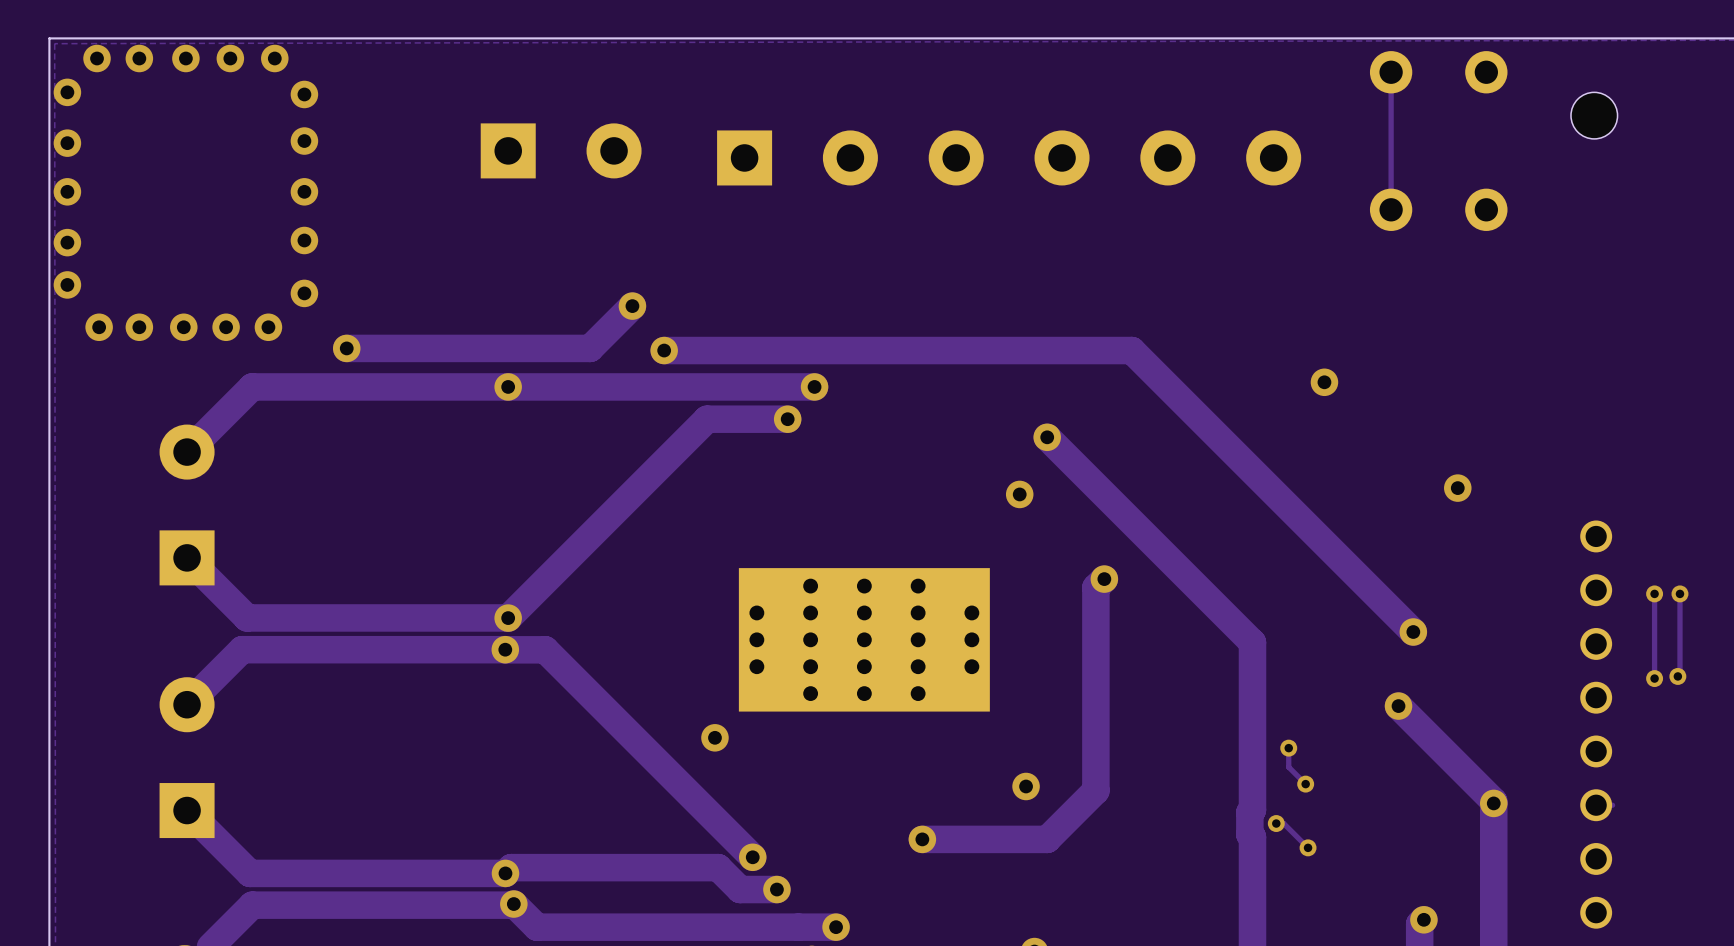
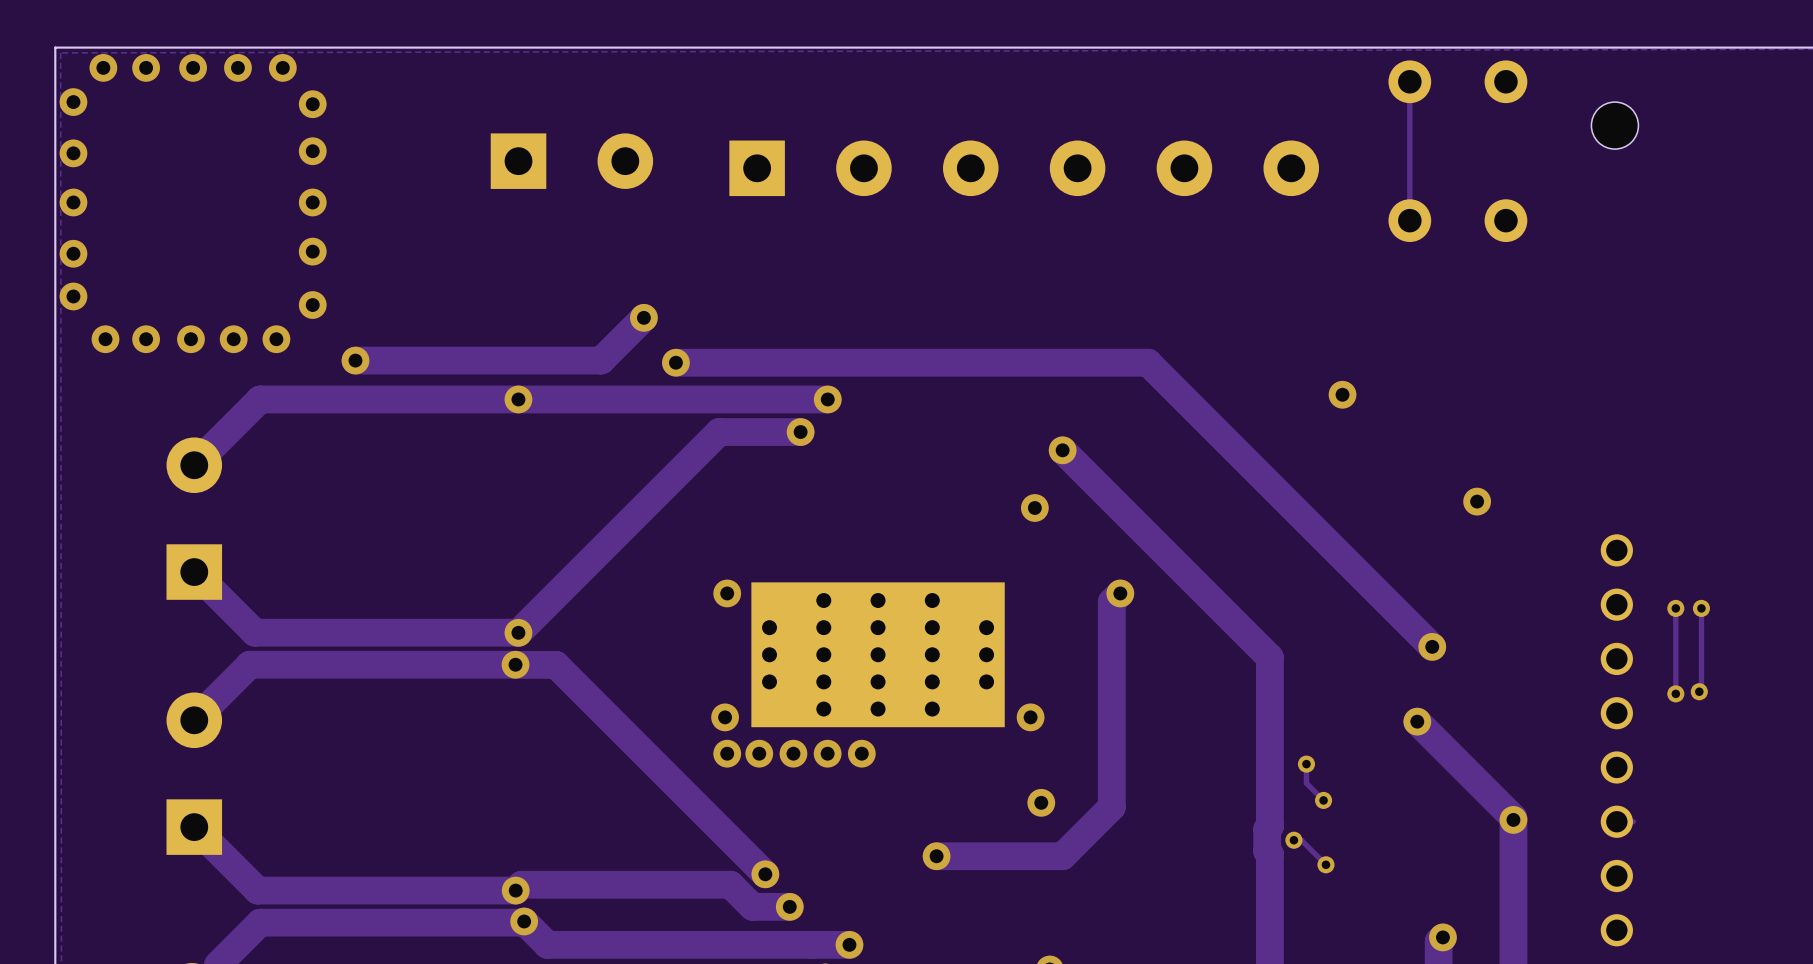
via: none -> (727, 593)
via: none -> (725, 717)
via: none -> (1030, 717)
via: none -> (759, 753)
via: none -> (793, 753)
via: none -> (827, 753)
via: none -> (861, 753)

